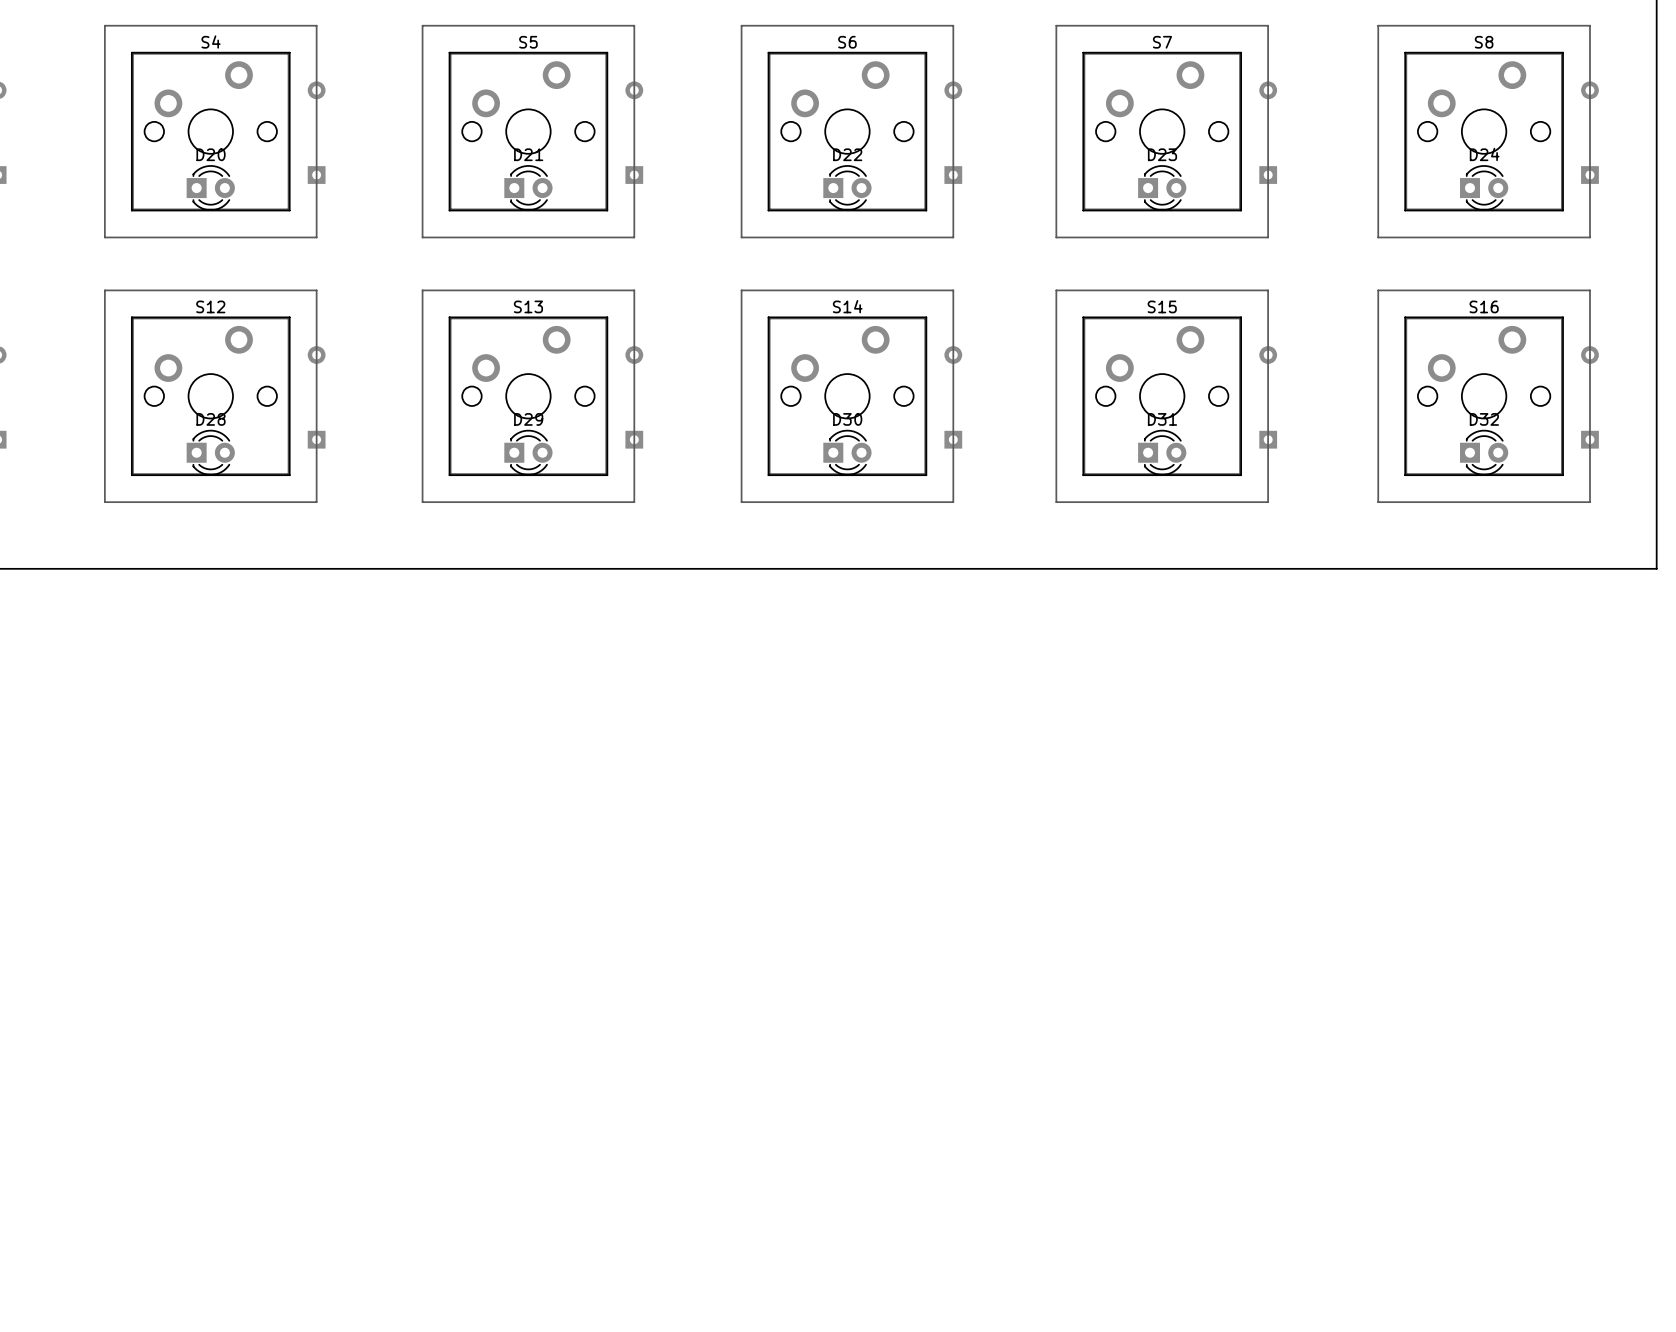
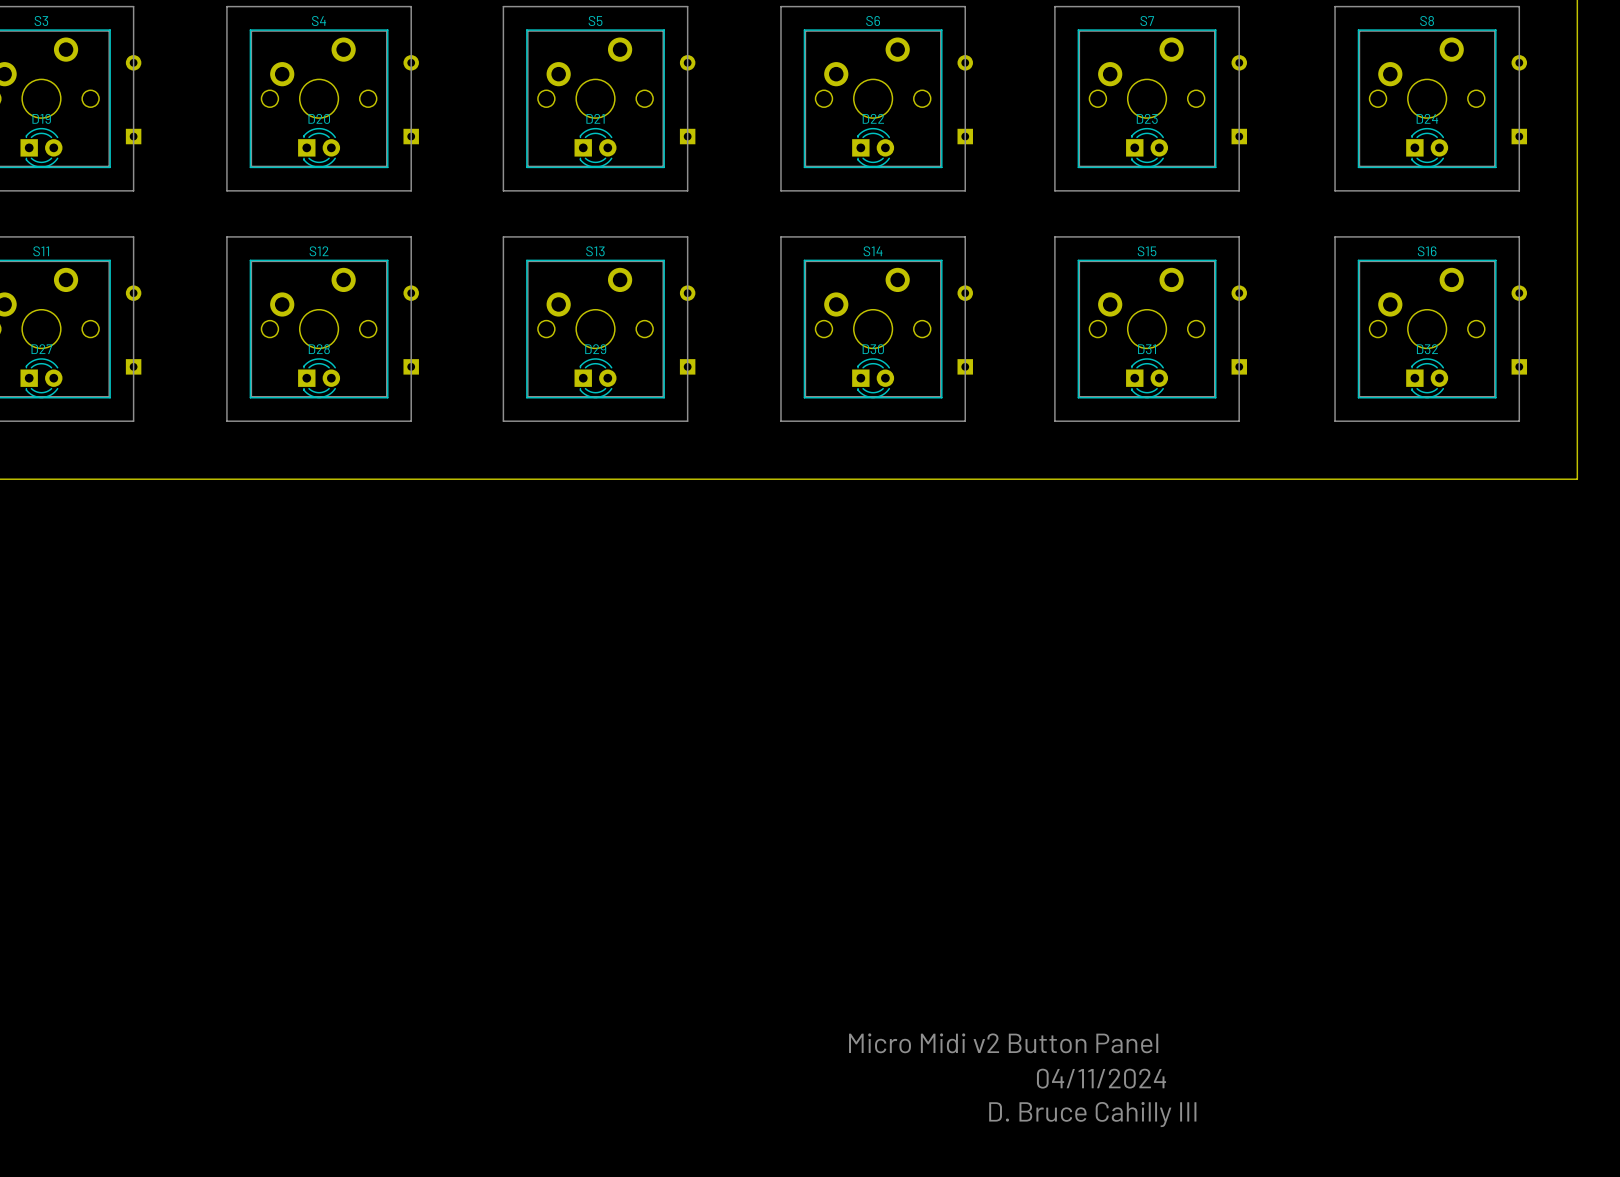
text: none -> Micro Midi v2 Button Panel (1003, 1043)
text: none -> 04/11/2024 (1101, 1078)
text: none -> D. Bruce Cahilly III (1092, 1114)

